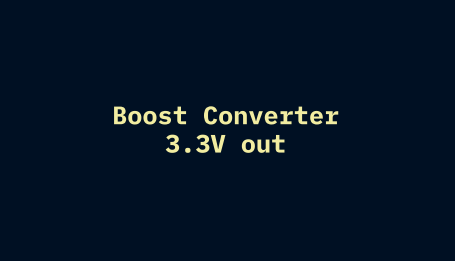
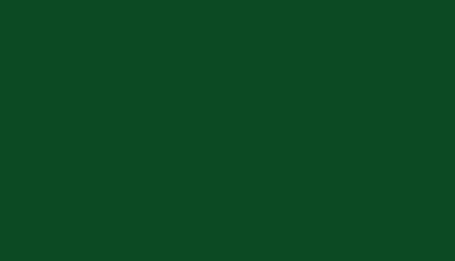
text: Boost Converter (226, 115) -> none
text: 3.3V out (225, 143) -> none

